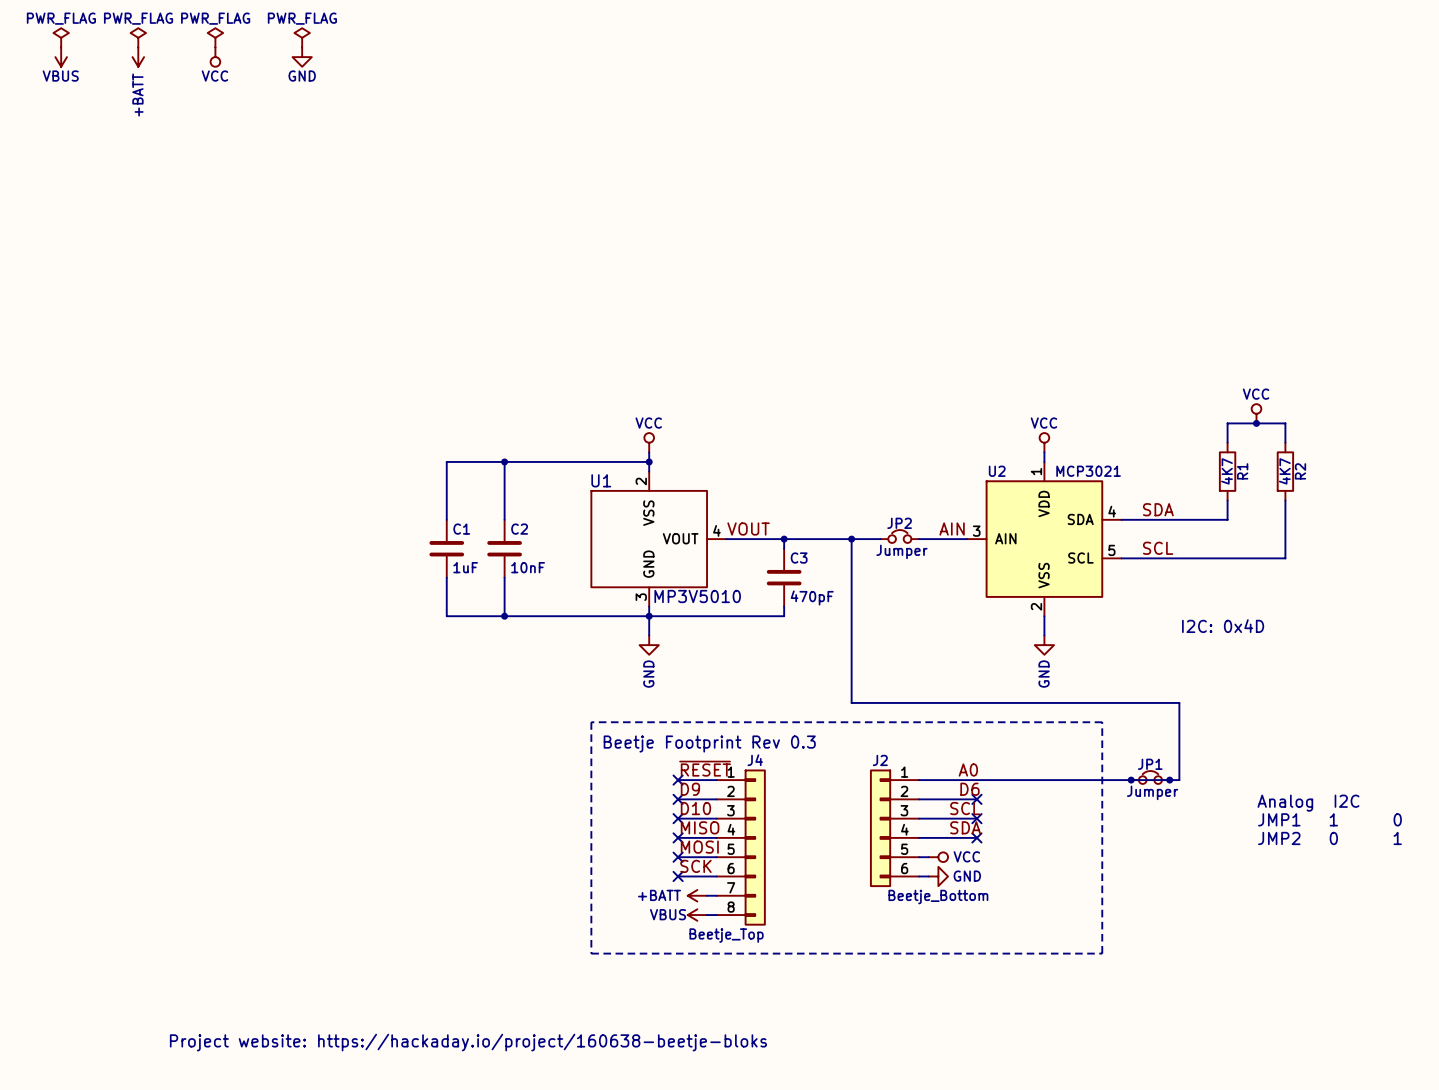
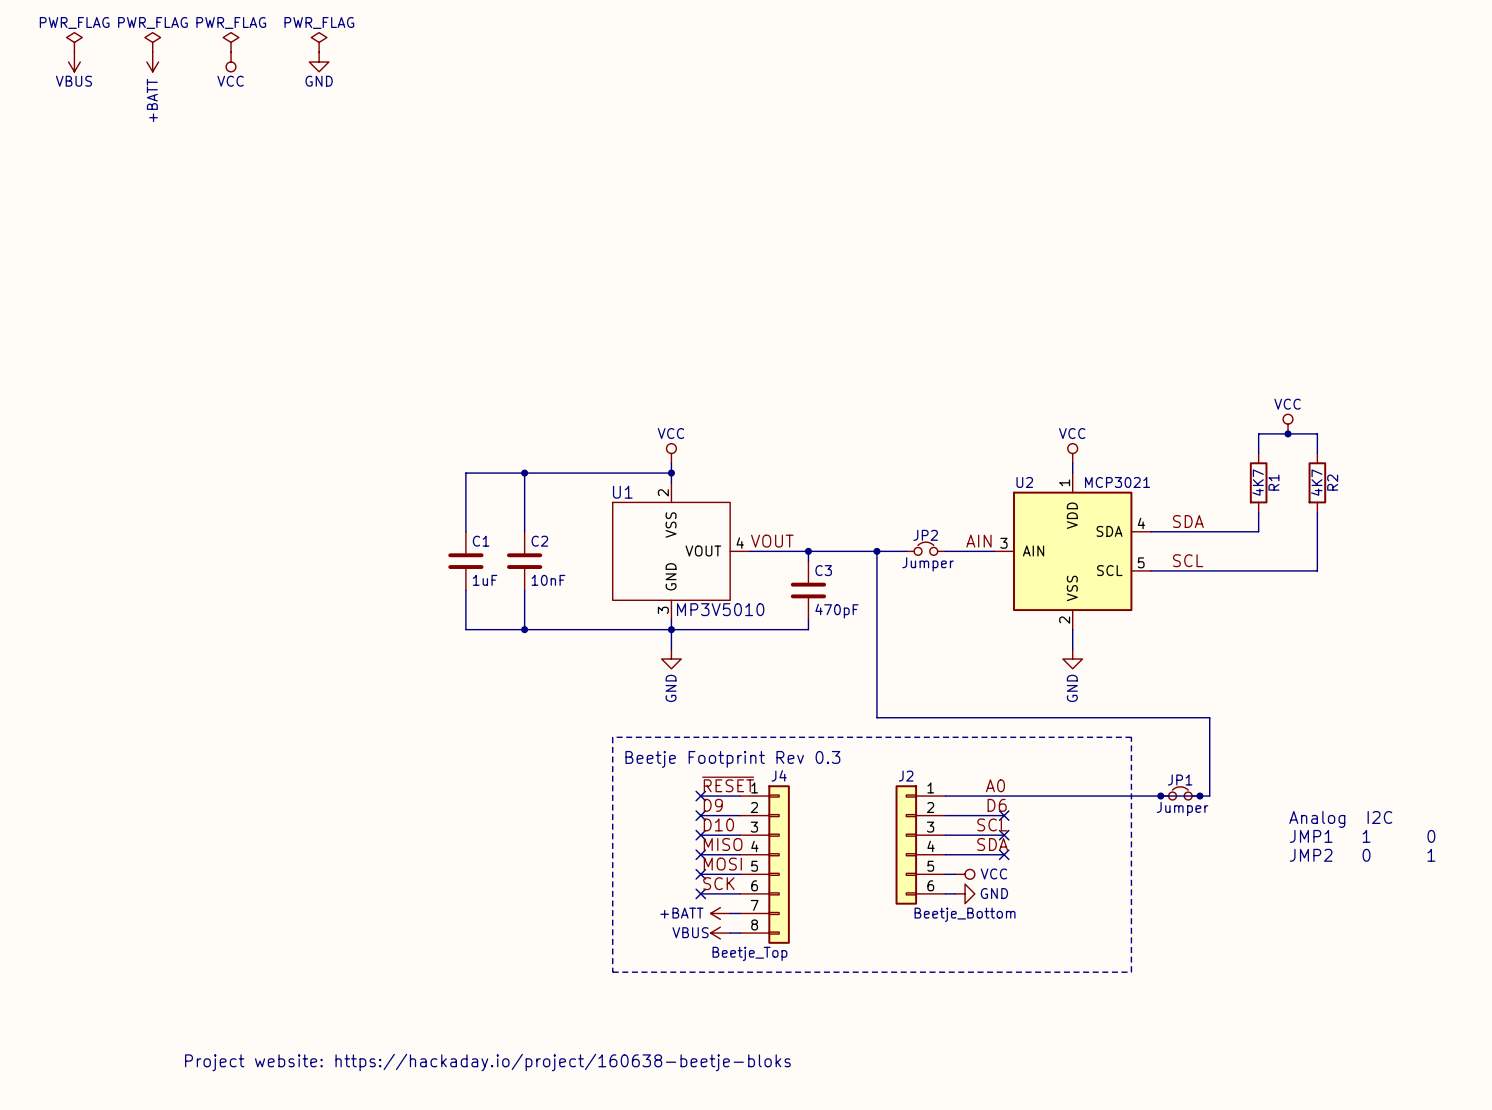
text: I2C: 0x4D (1223, 626) -> none

